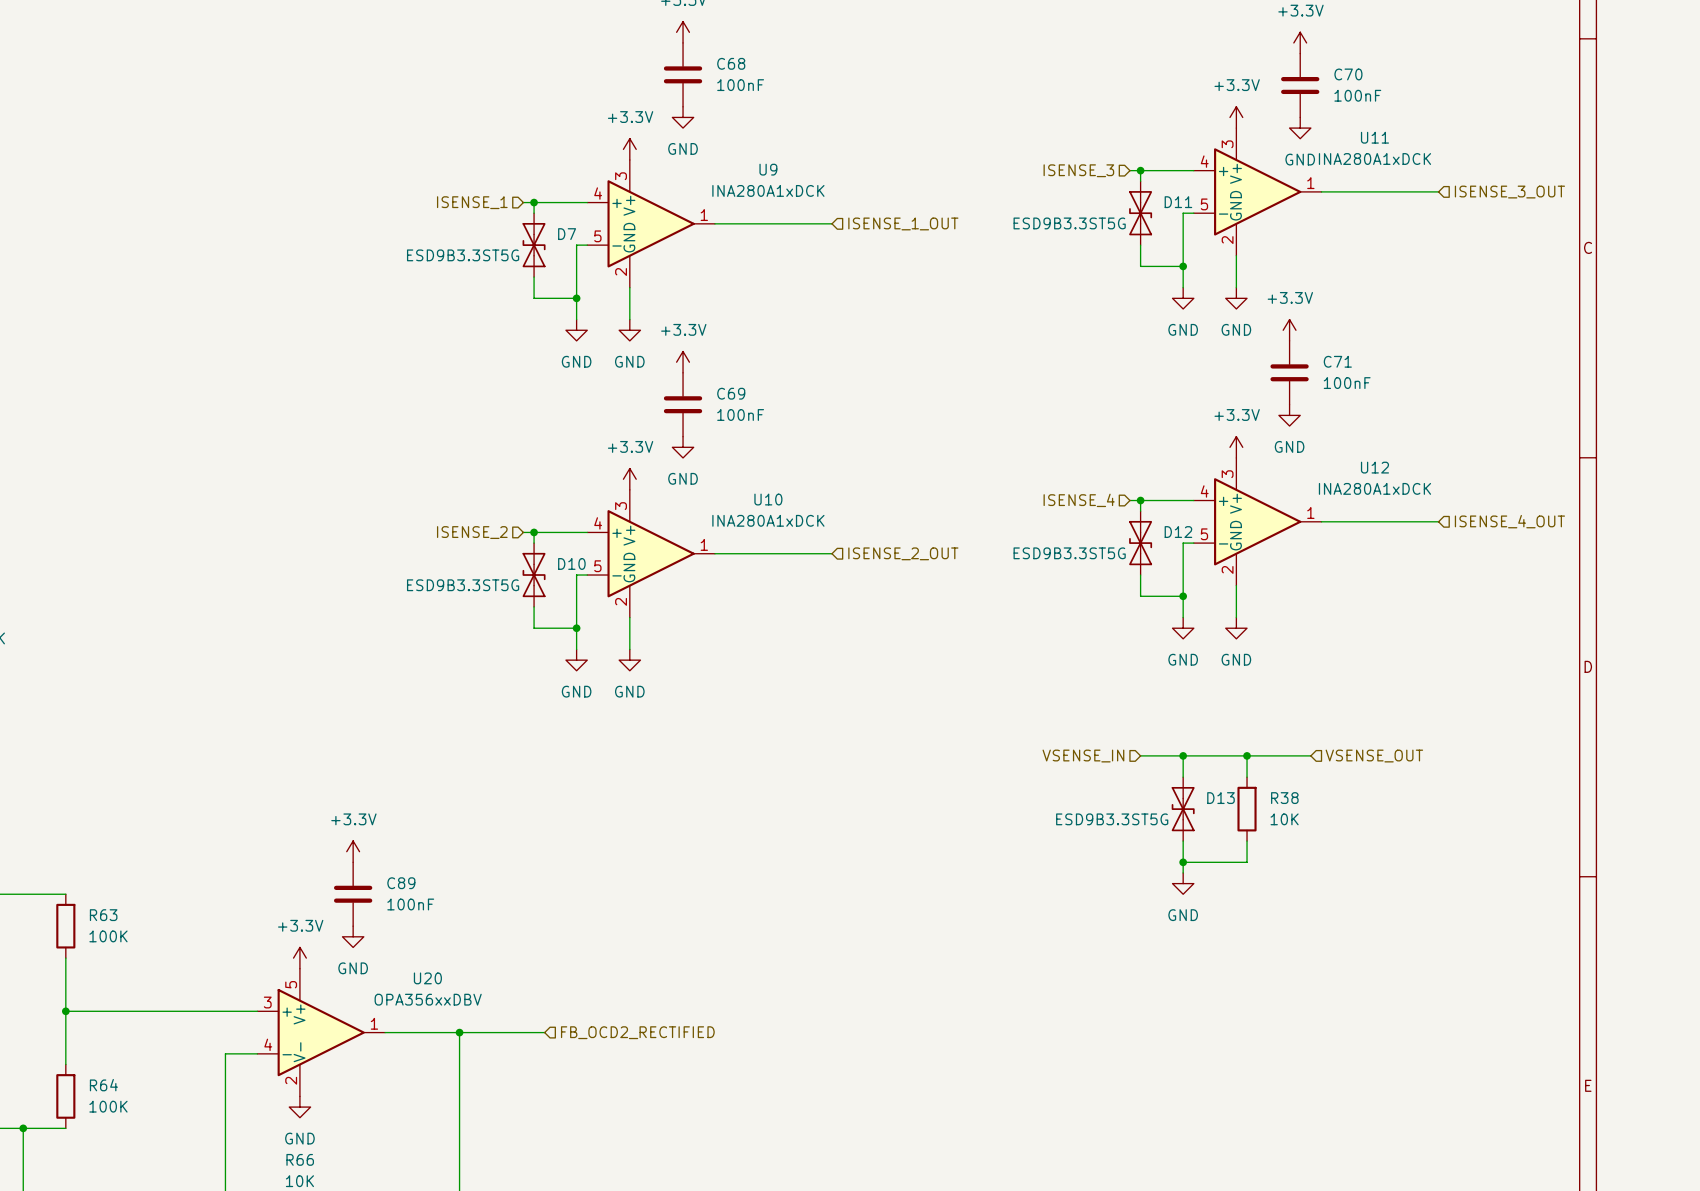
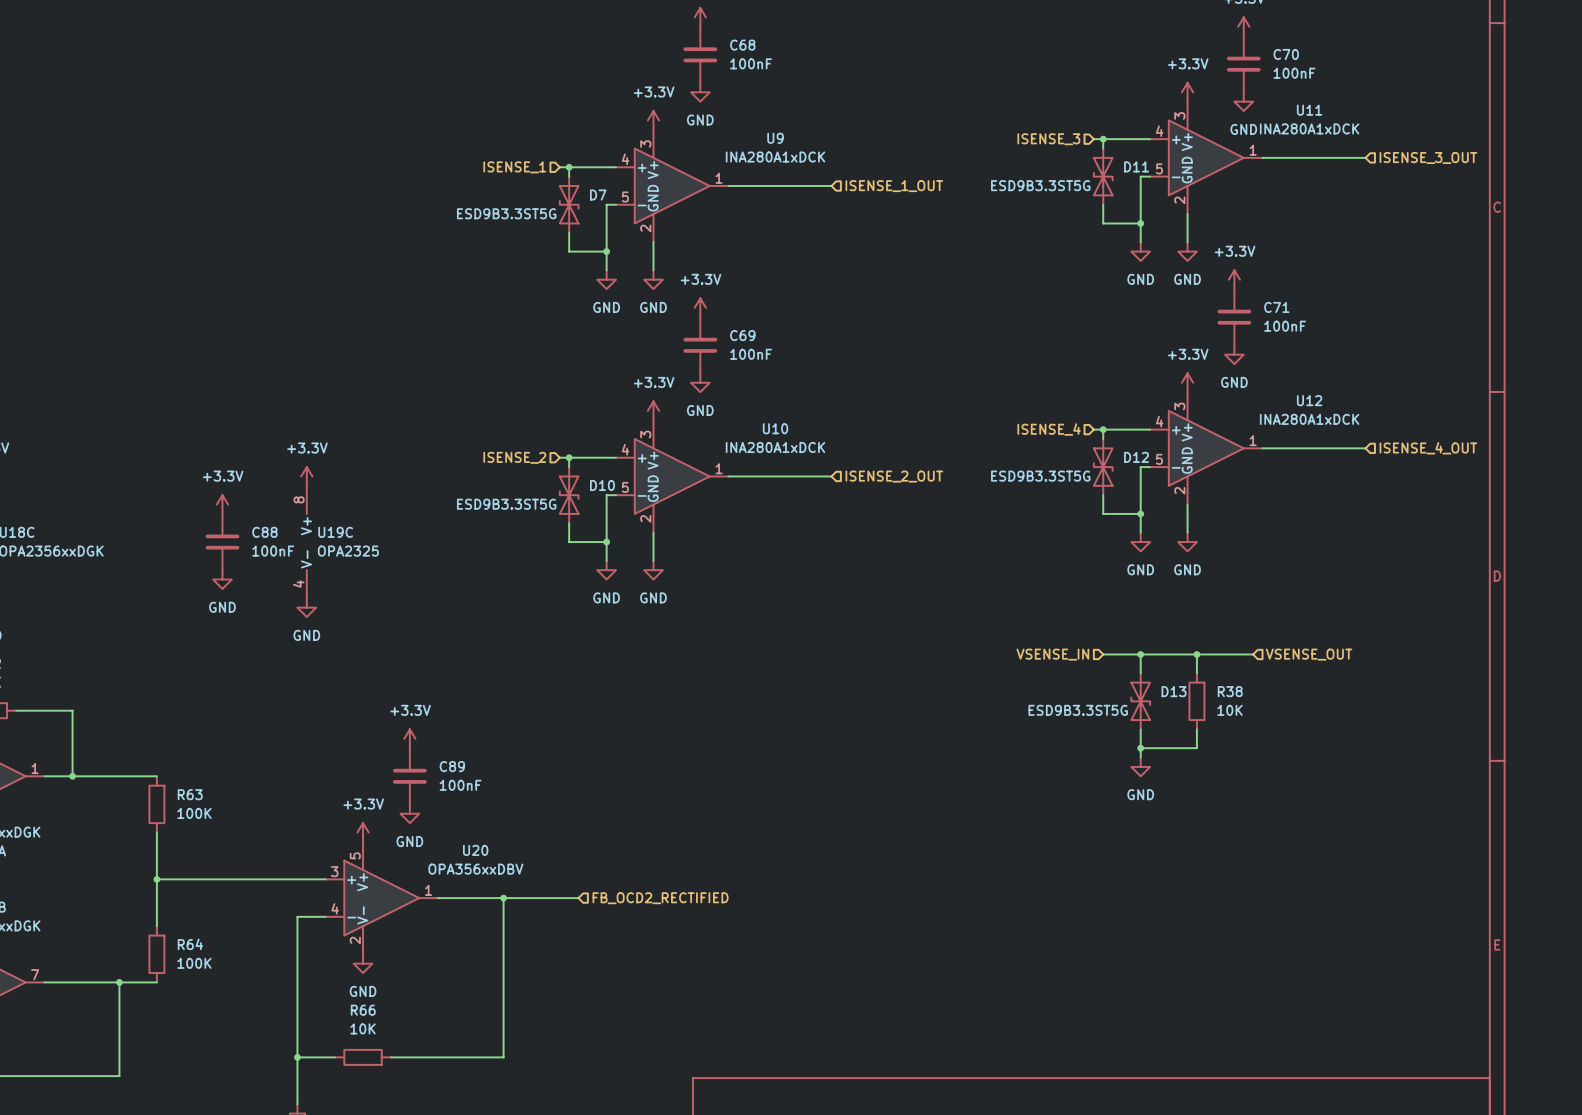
power symbol: none -> +3.3V (306, 476)
power symbol: none -> +3.3V (222, 504)
C88: none -> 100nF (222, 542)
U19C: none -> OPA2325 (306, 542)
power symbol: none -> GND (222, 579)
power symbol: none -> GND (306, 607)

